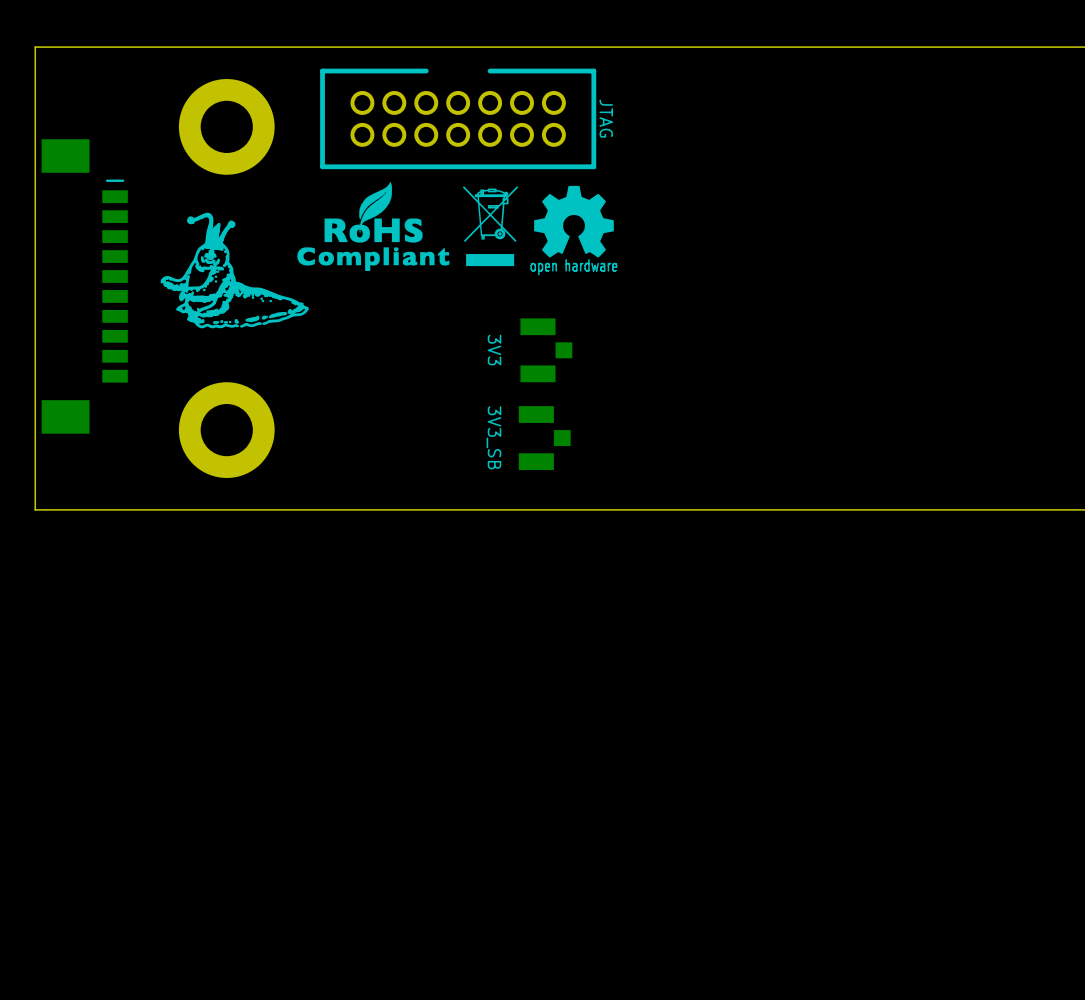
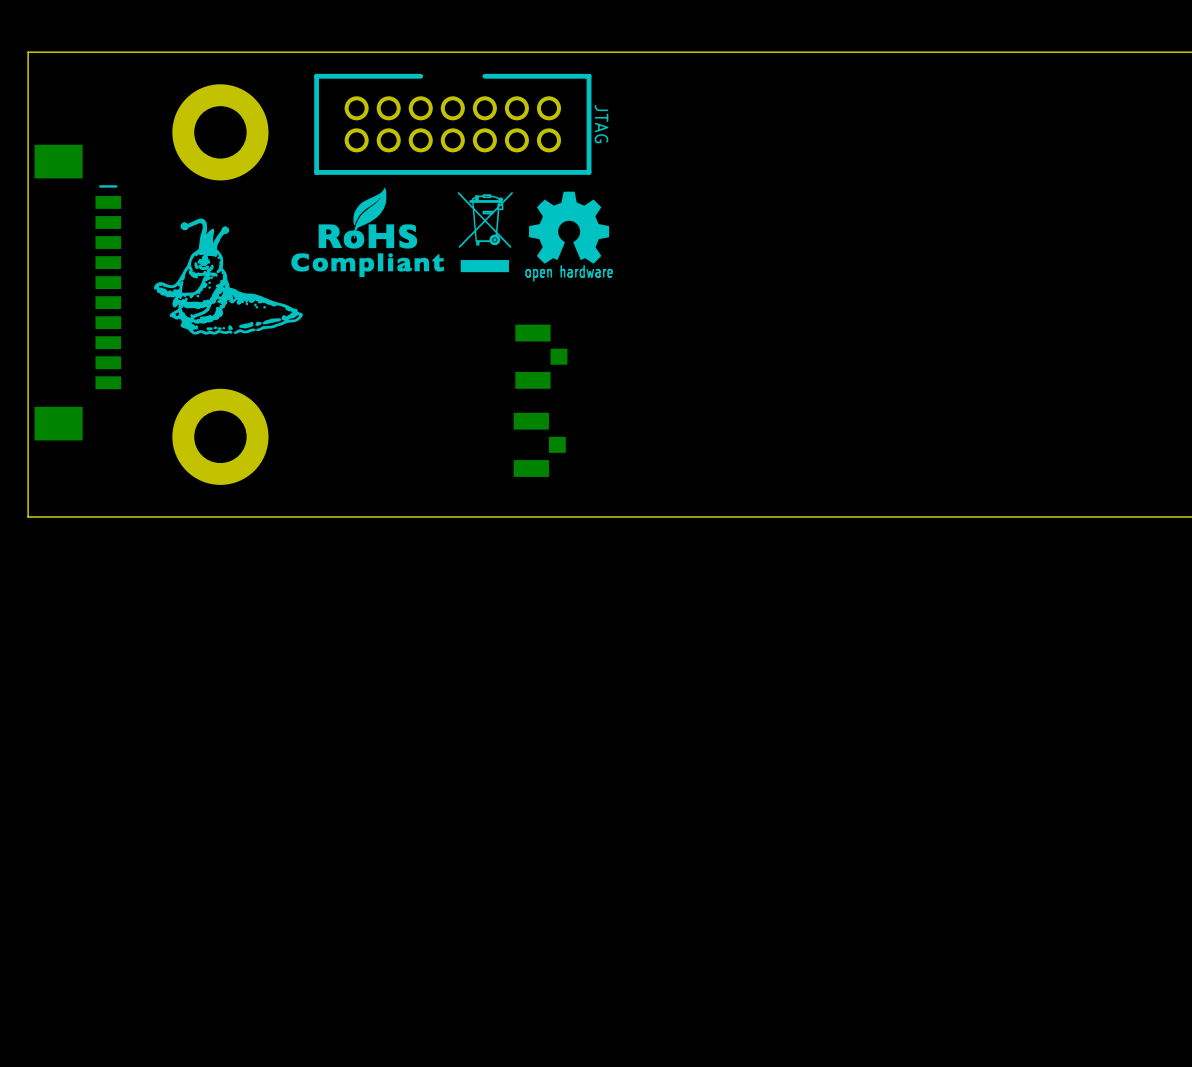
text: 3V3 (494, 350) -> none
text: 3V3_SB (493, 437) -> none

